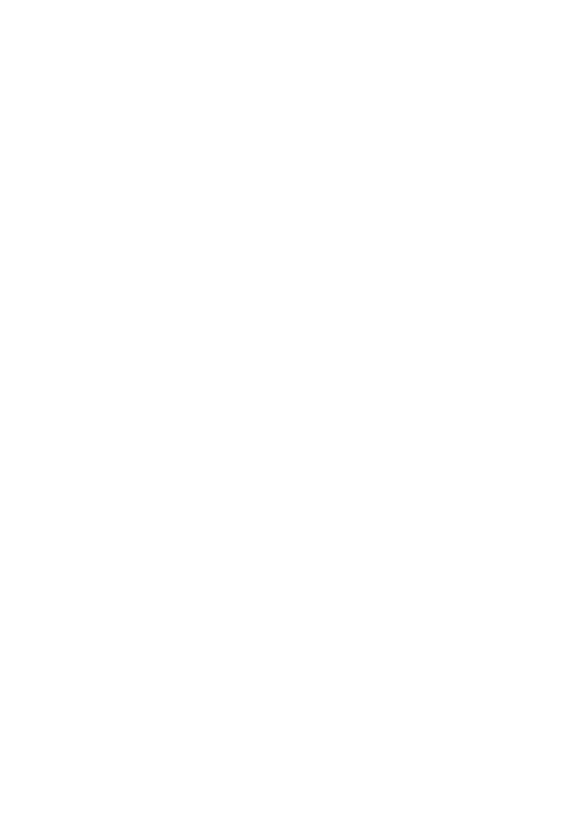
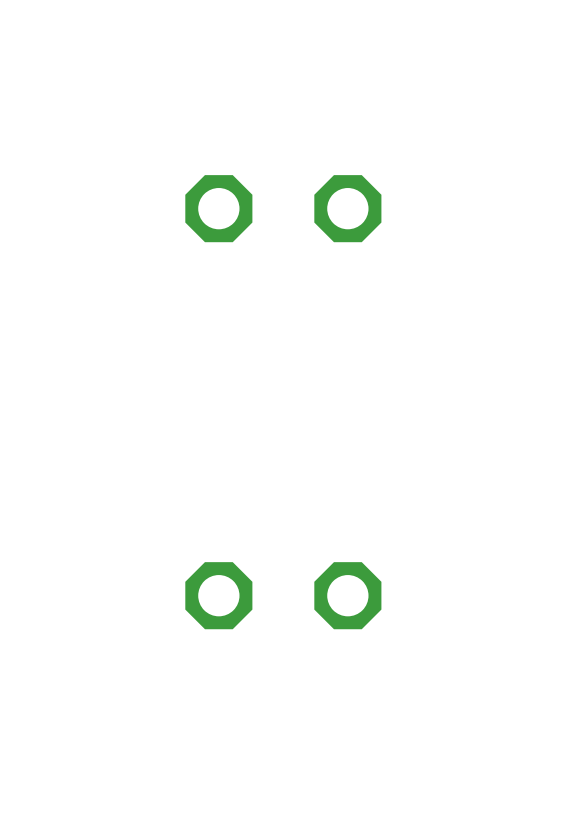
part: none -> (283, 208)
part: none -> (283, 595)

